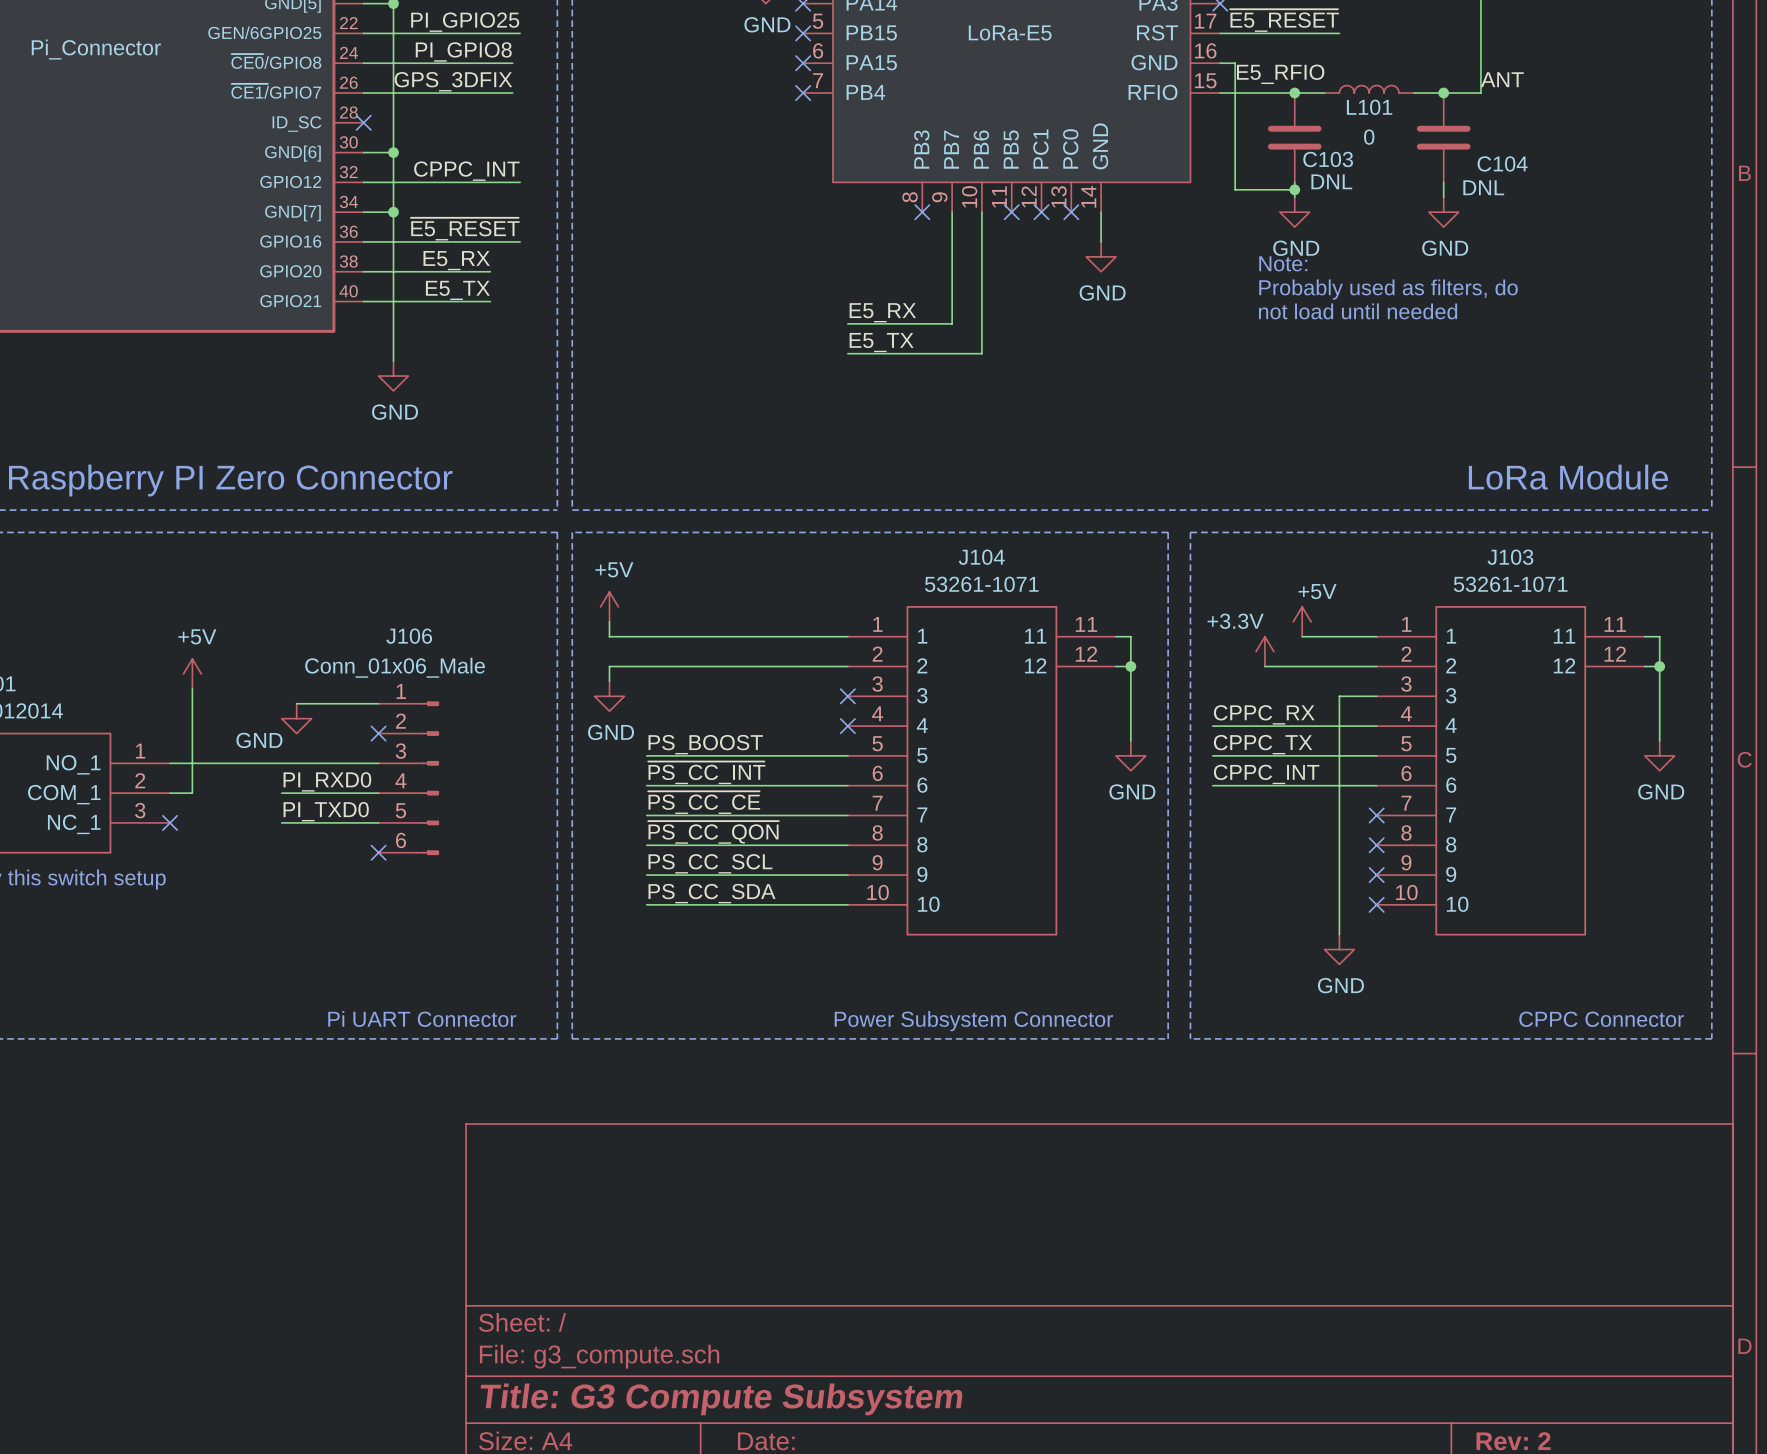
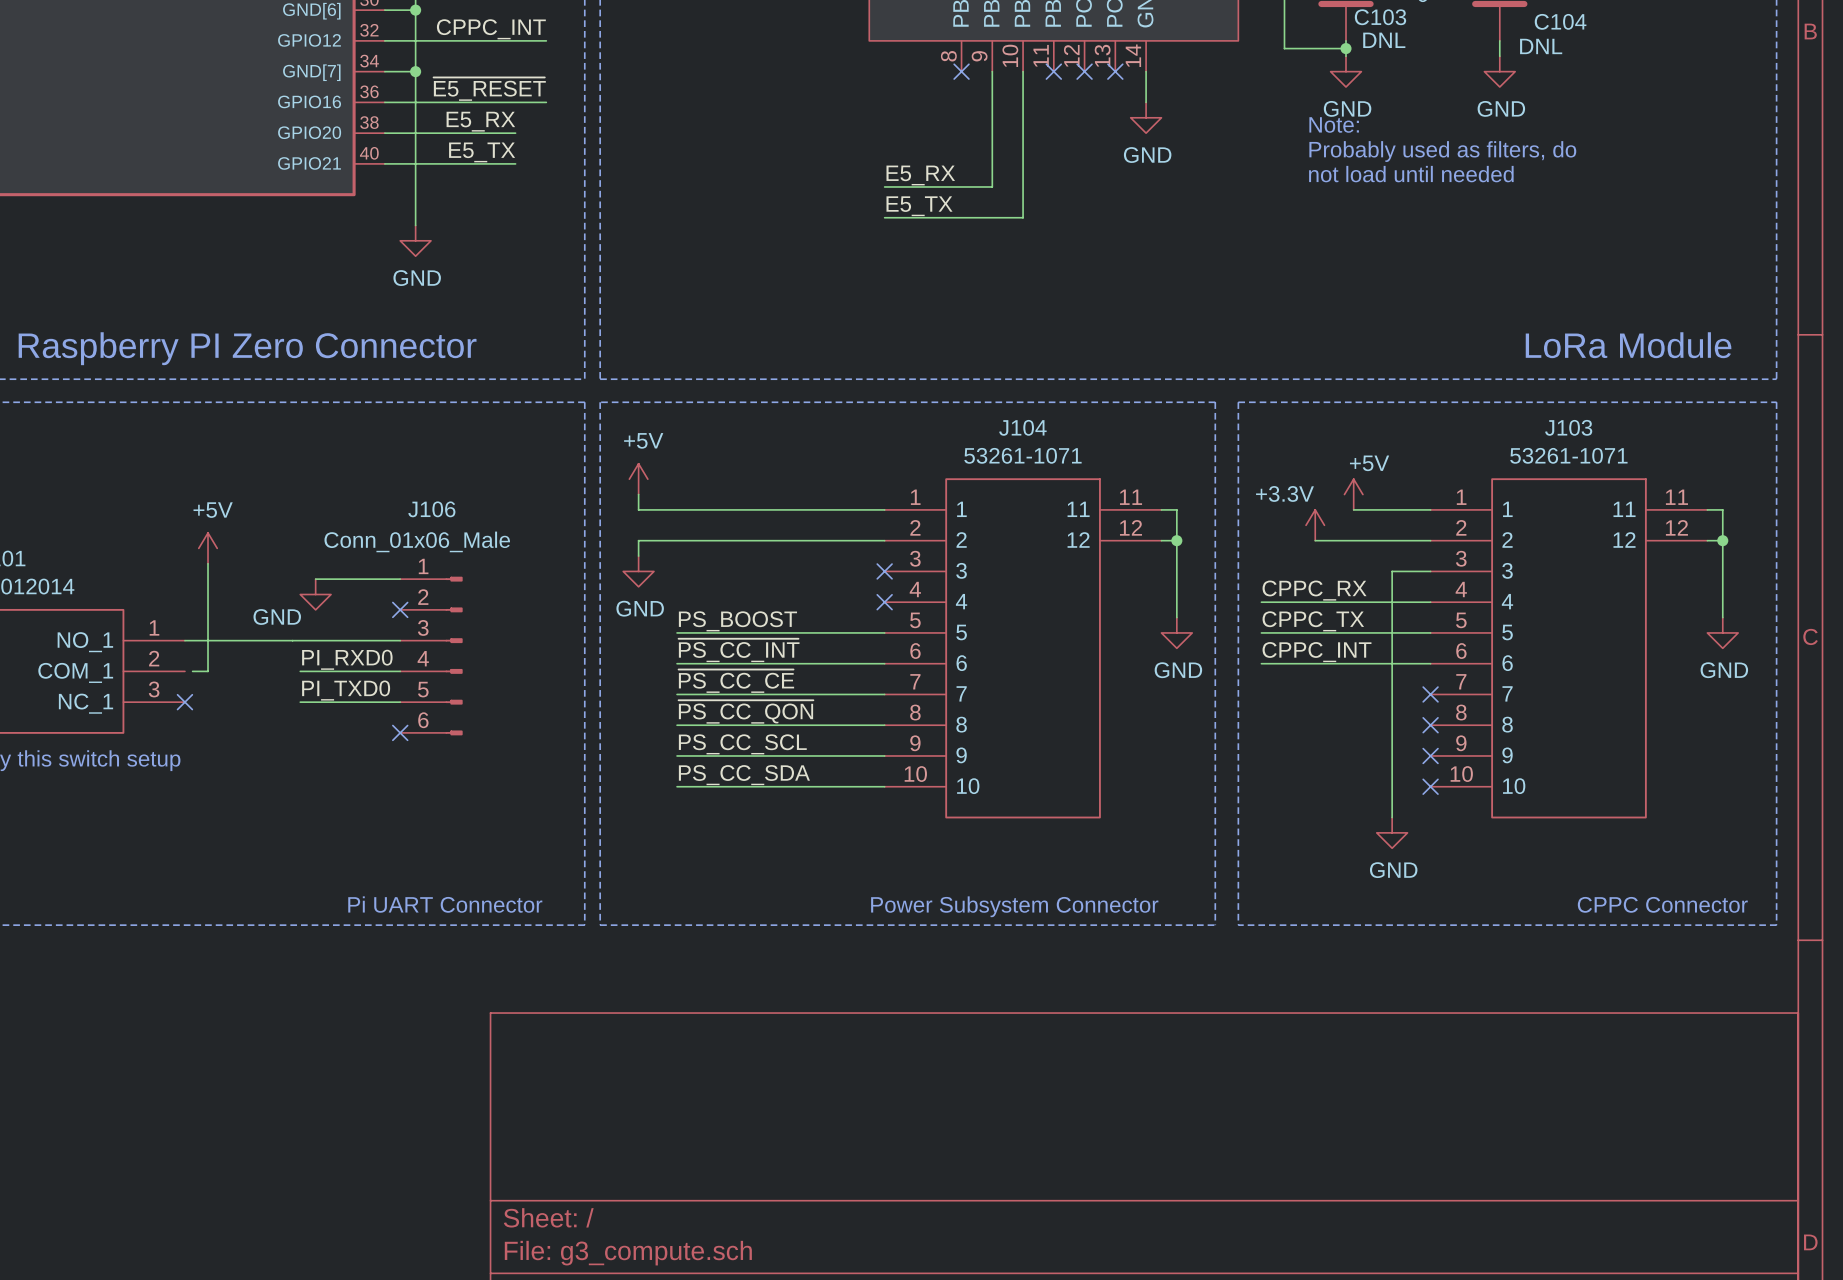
wire: (170, 793) (177, 793) -> none

